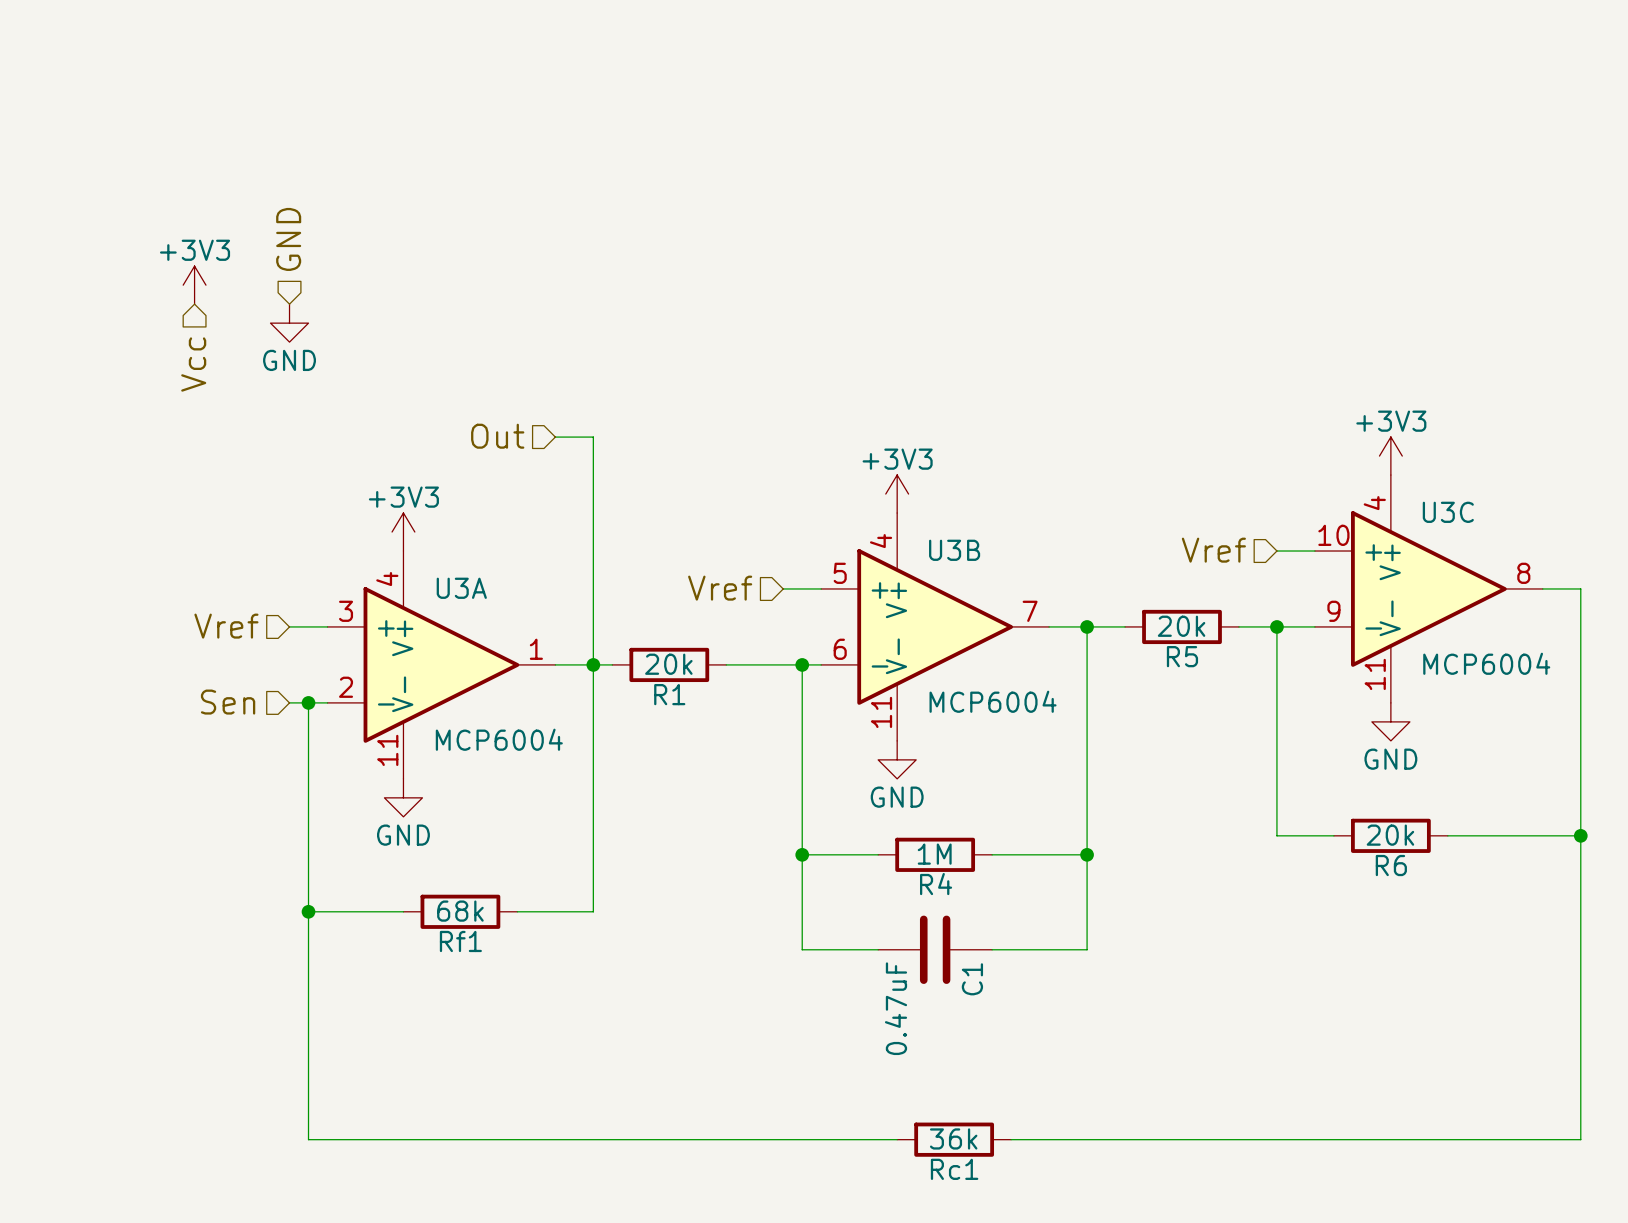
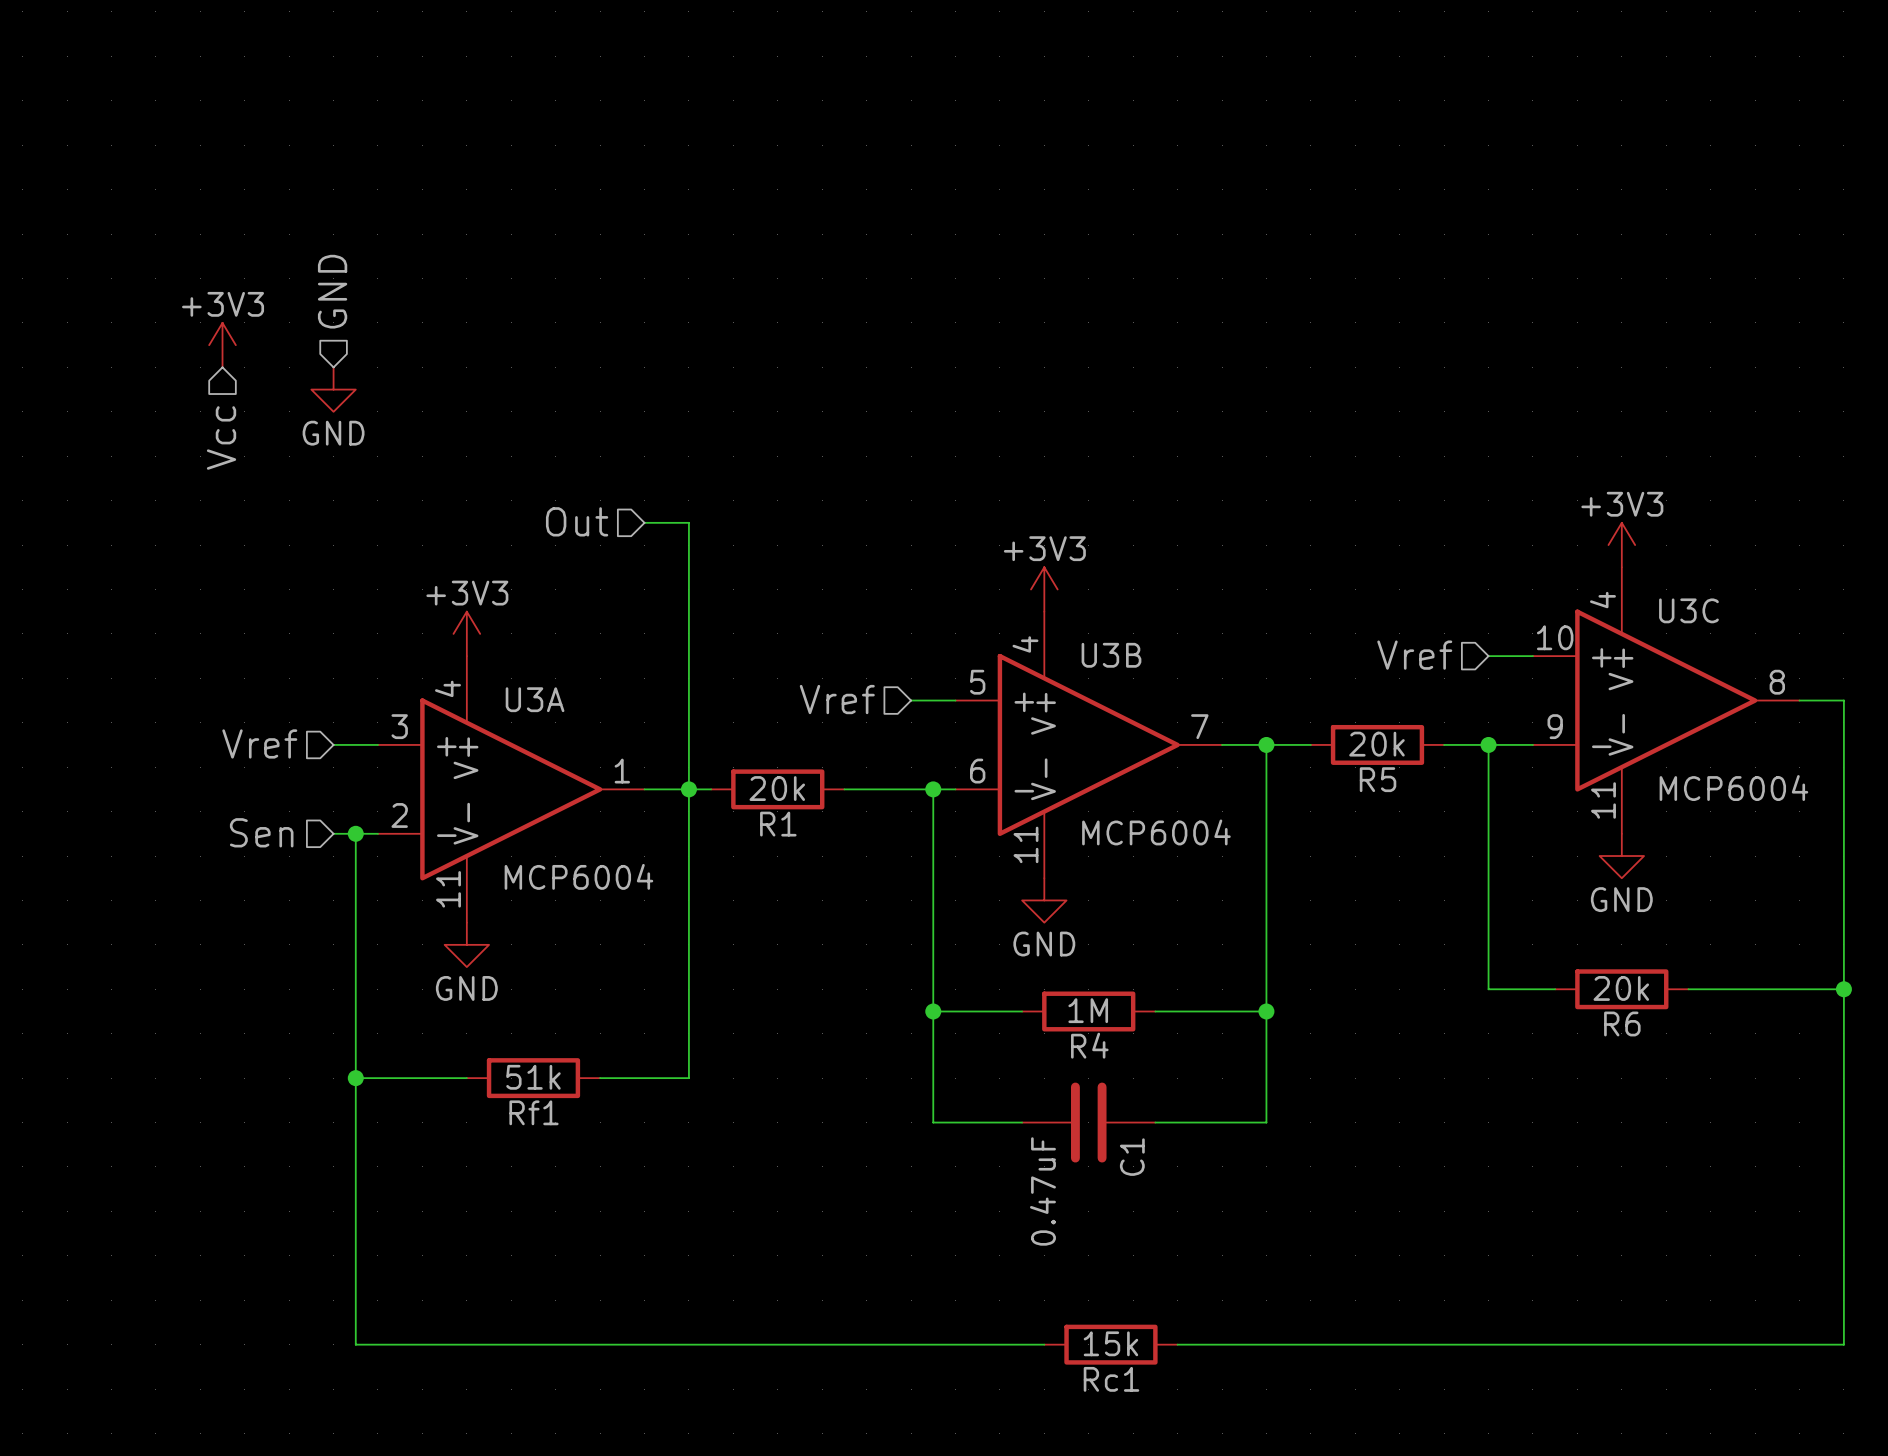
Rf1 value: 68k (460, 911) -> 51k (533, 1077)
Rc1 value: 36k (953, 1138) -> 15k (1110, 1343)

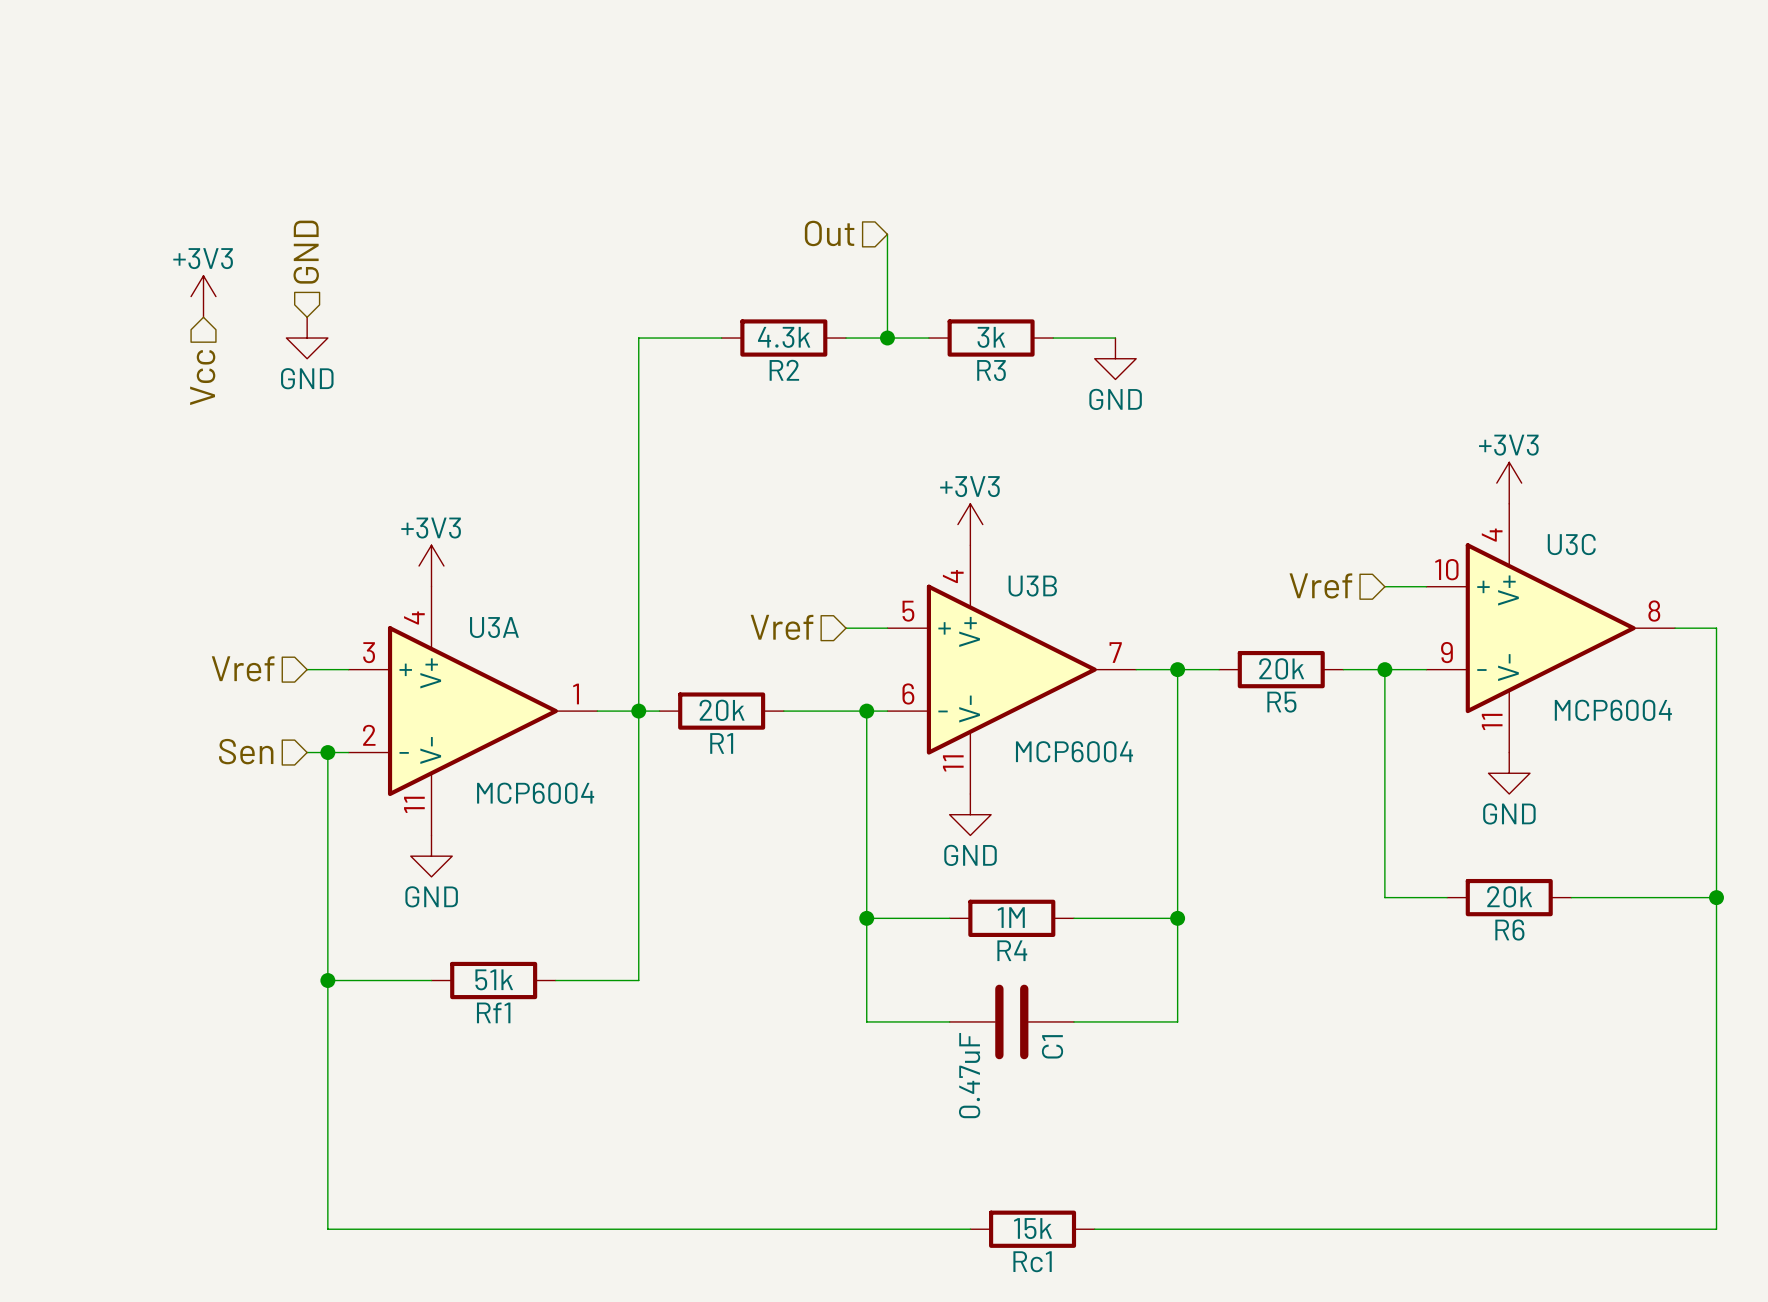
wire: none -> (887, 234) (887, 338)
R2: none -> 4.3k (783, 338)
wire: none -> (846, 338) (928, 338)
junction: none -> (887, 338)
R3: none -> 3k (991, 338)
wire: none -> (1053, 338) (1115, 338)
power symbol: none -> GND (1115, 358)
hierarchical label position: Out (577, 521) -> Out (829, 233)
wire: (644, 522) (688, 522) -> (721, 338) (638, 338) (638, 462)

